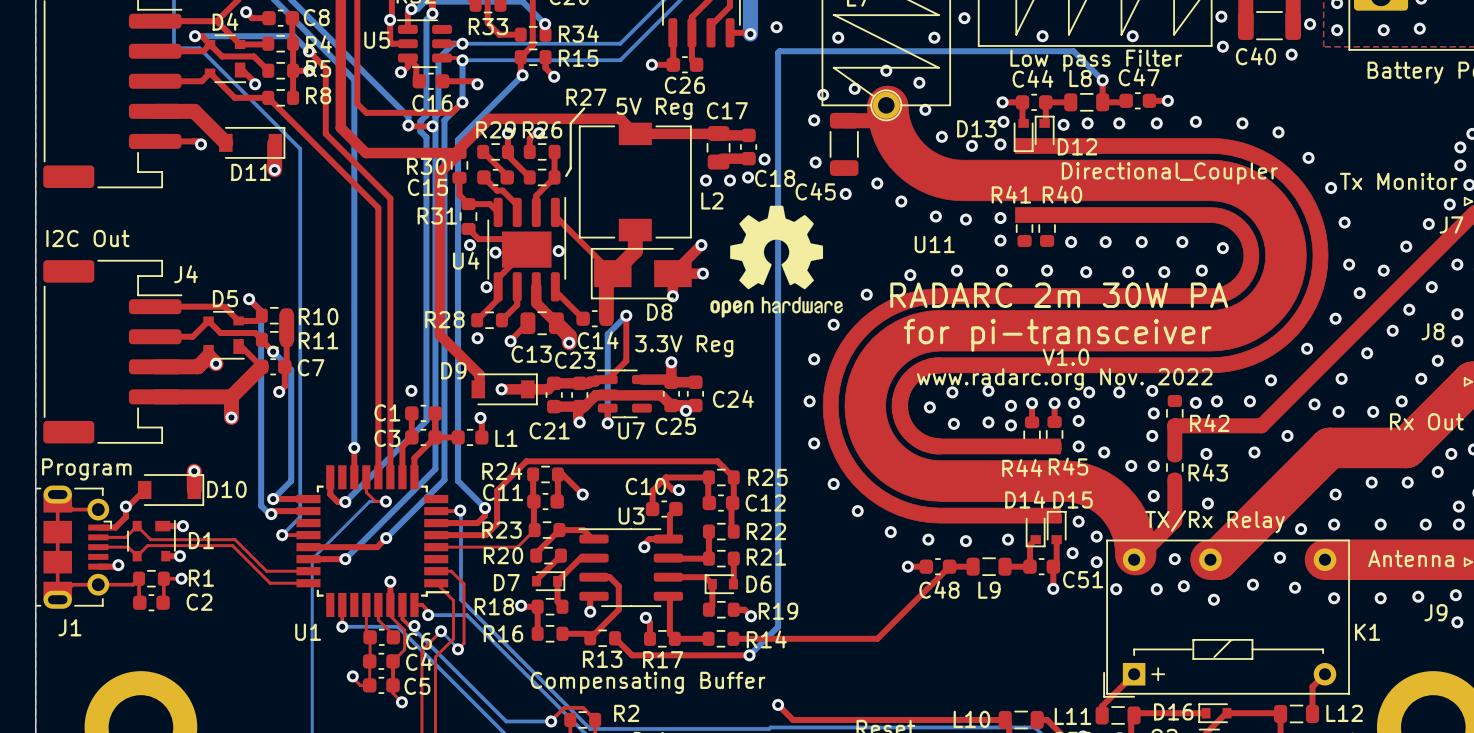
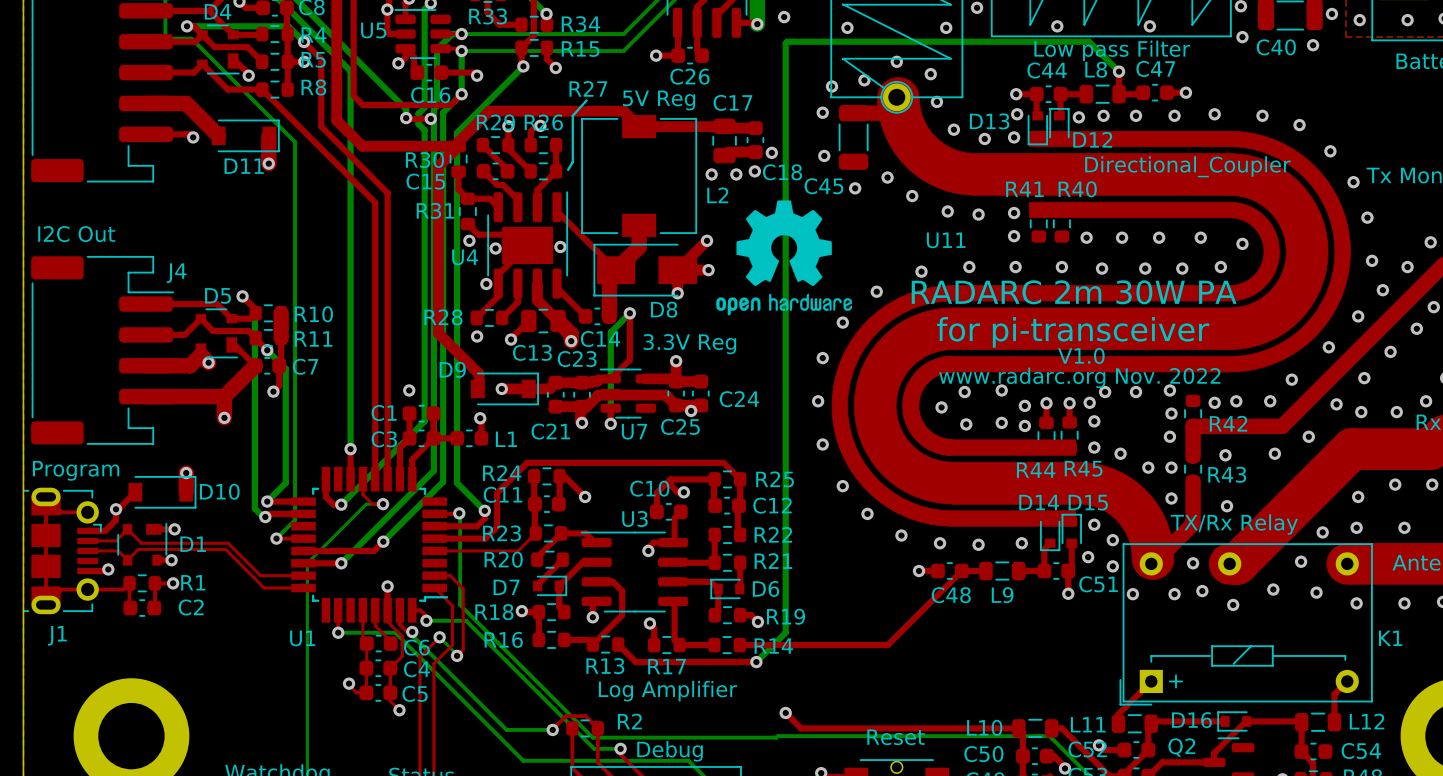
text: Compensating Buffer (648, 682) -> none
text: none -> Log Amplifier (667, 691)

